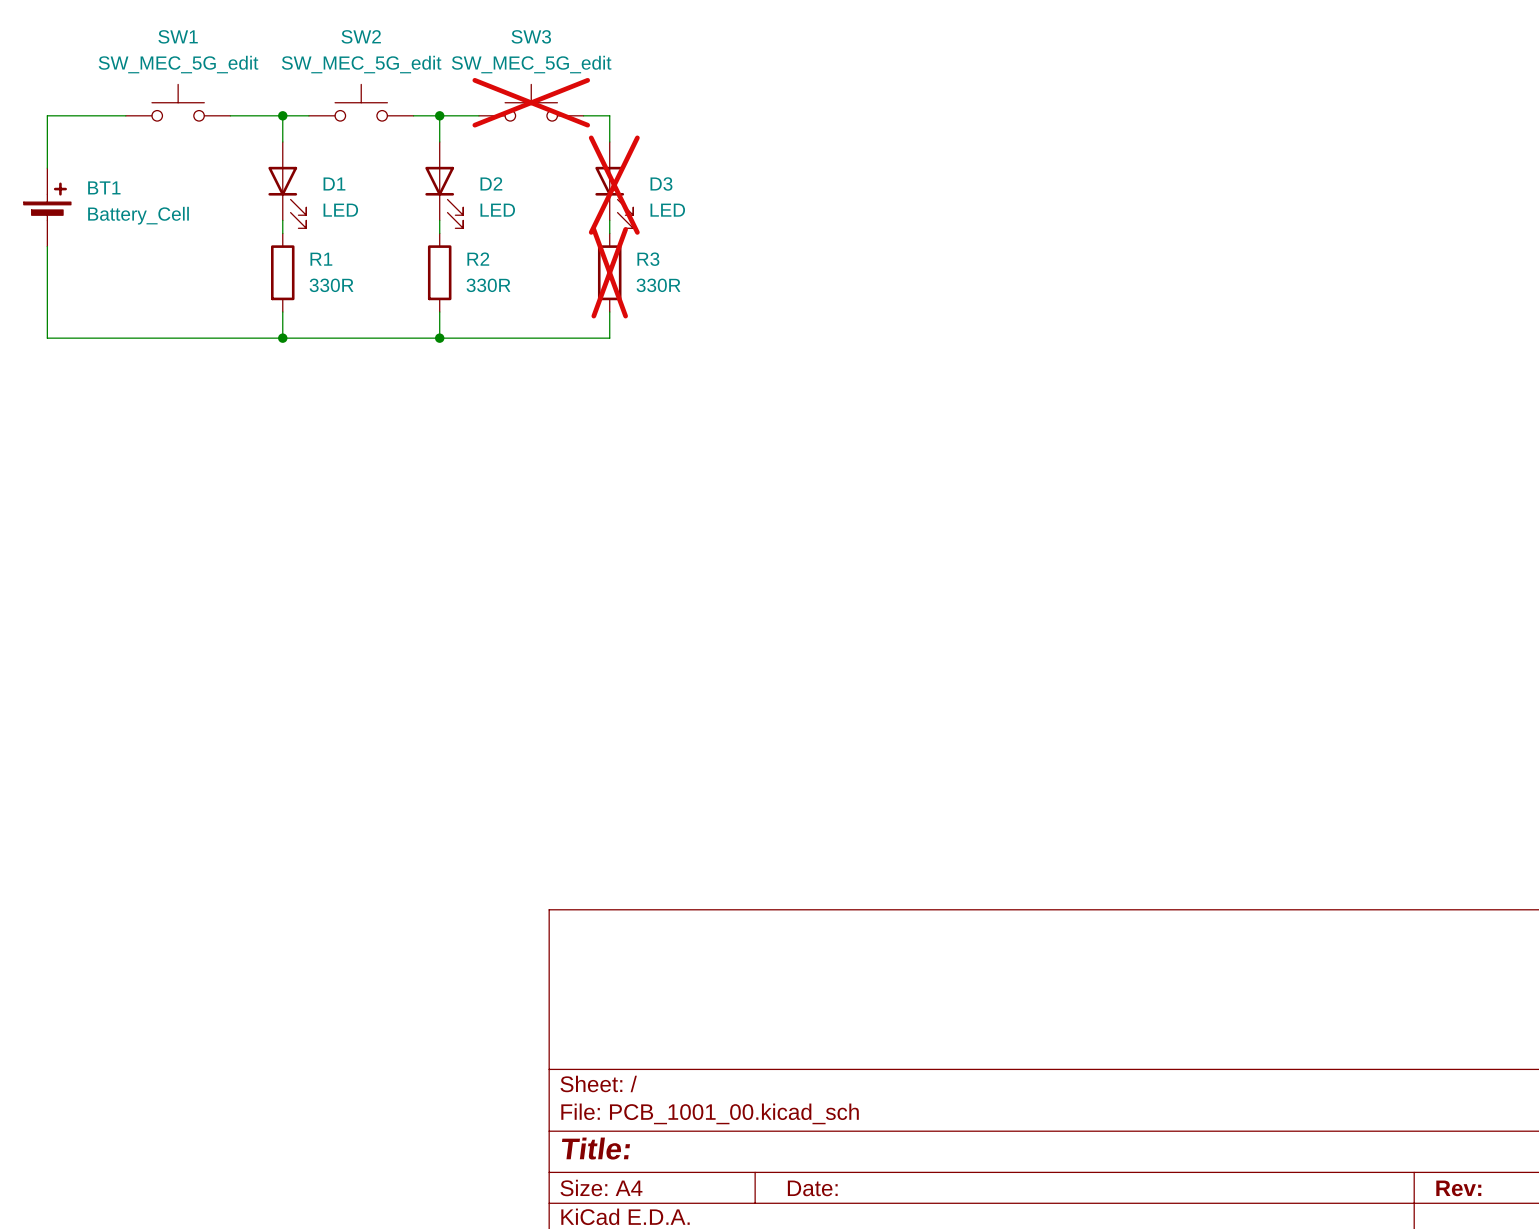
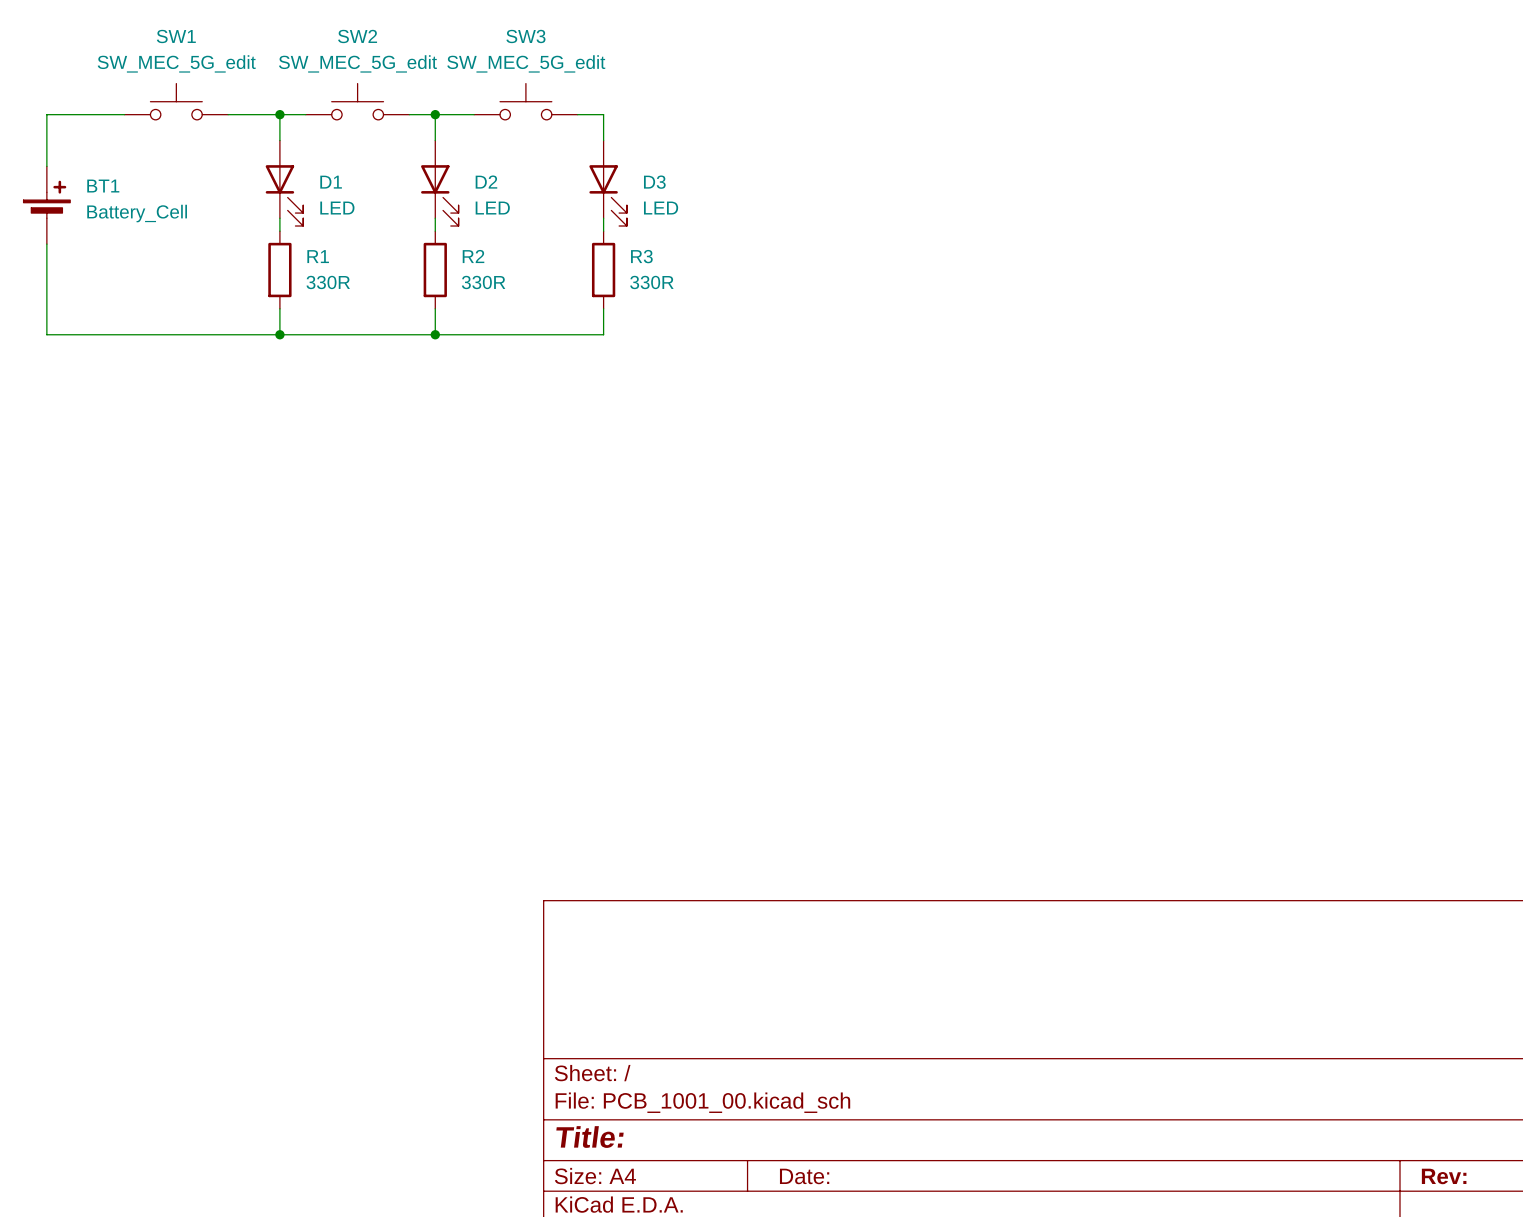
SW3 do-not-place cross: (531, 102) -> none
D3 do-not-place cross: (614, 185) -> none
R3 do-not-place cross: (609, 272) -> none

